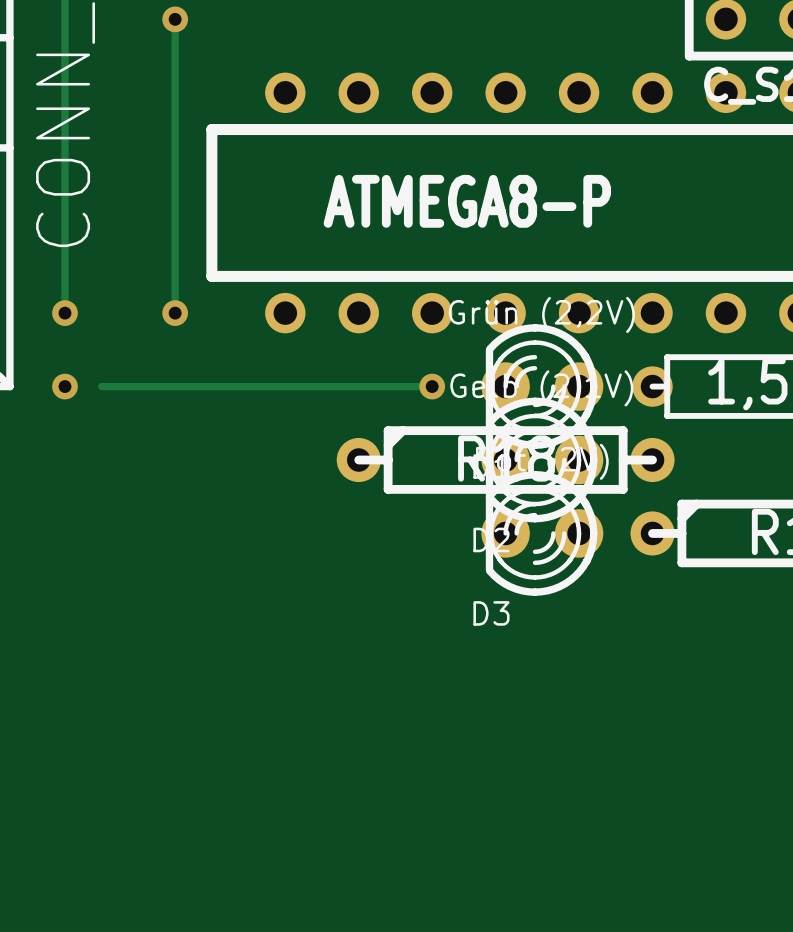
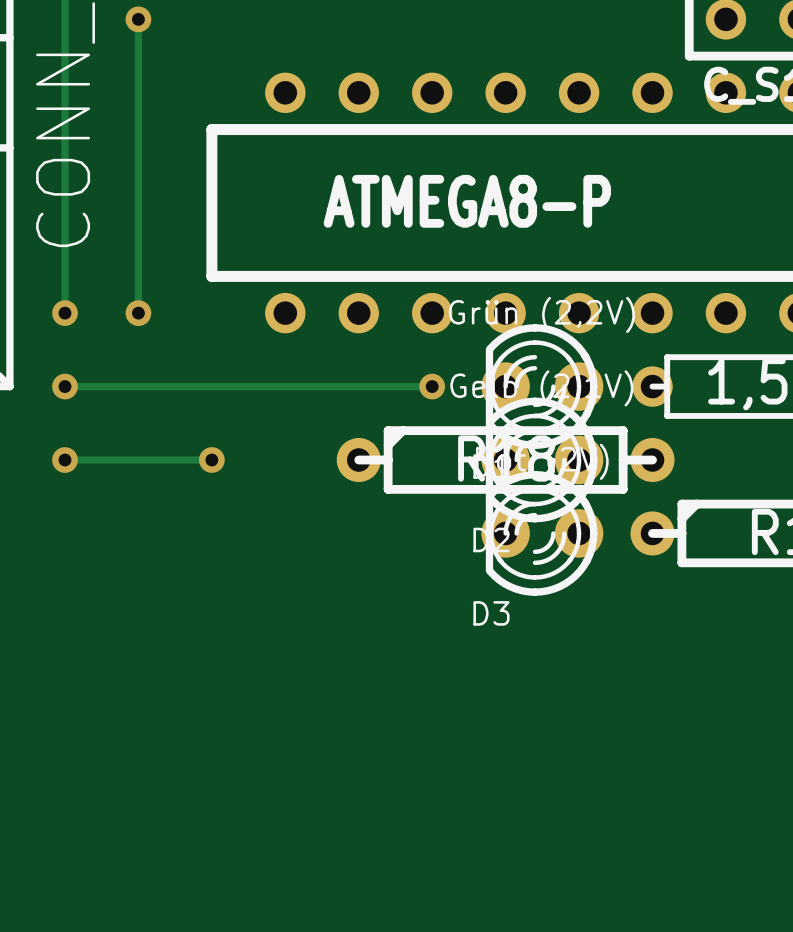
track: (175, 19) (175, 313) -> (138, 19) (138, 313)
via position: (175, 19) -> (138, 19)
via position: (175, 313) -> (138, 313)
track: none -> (65, 386) (101, 386)
track: none -> (65, 460) (211, 460)
via: none -> (65, 460)
via: none -> (211, 460)

